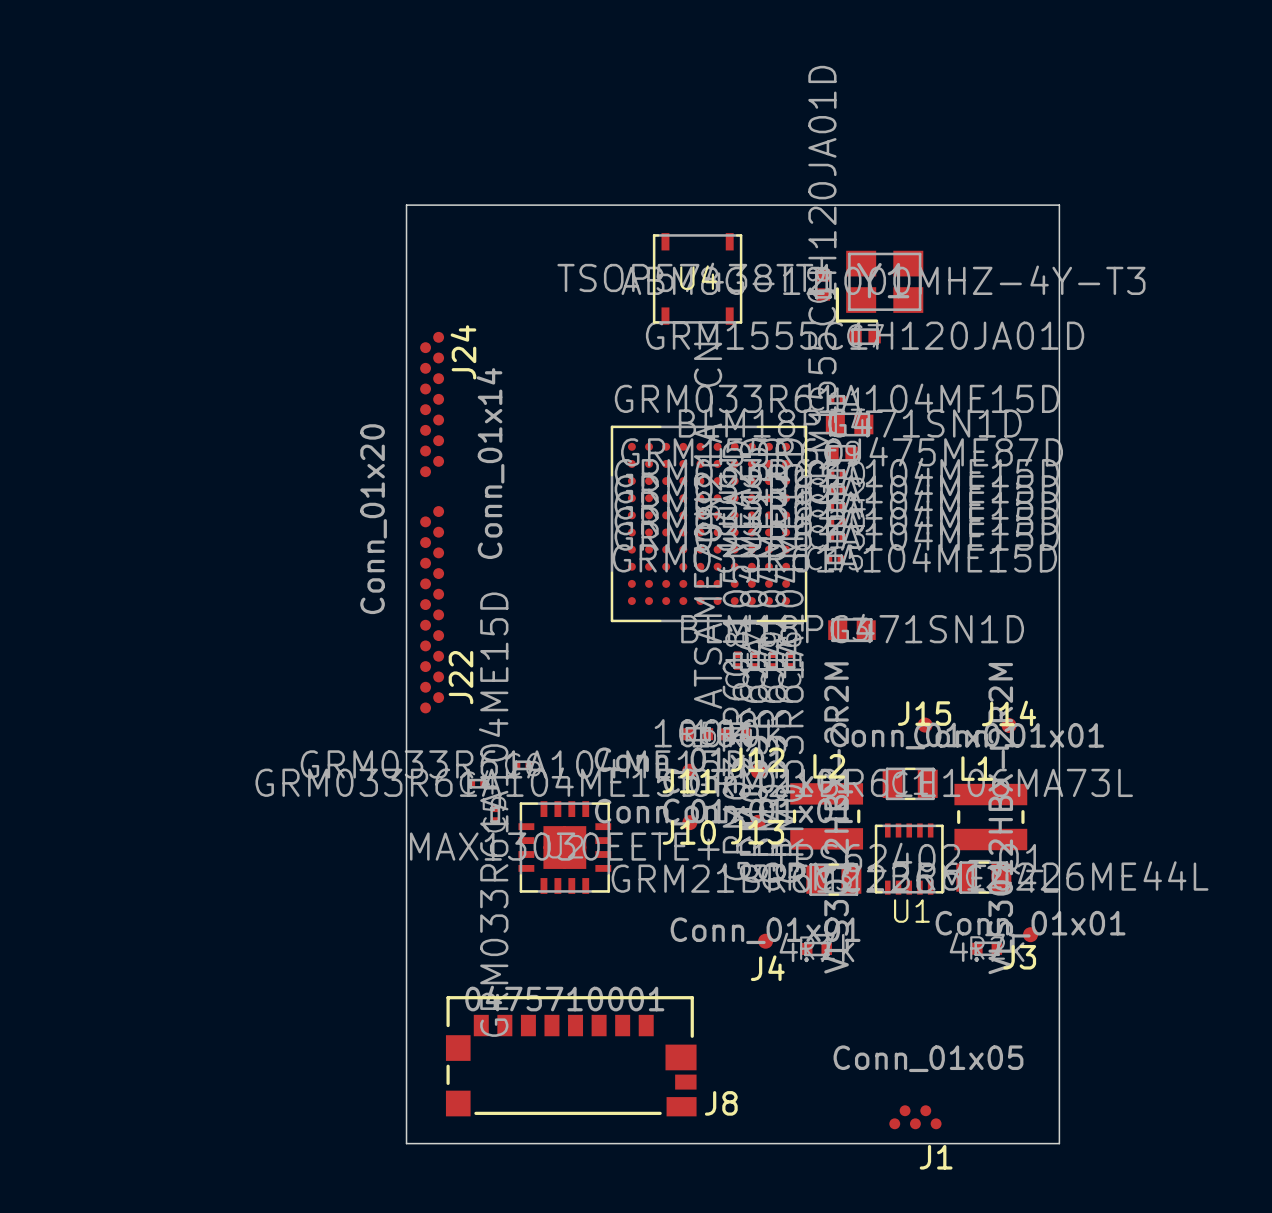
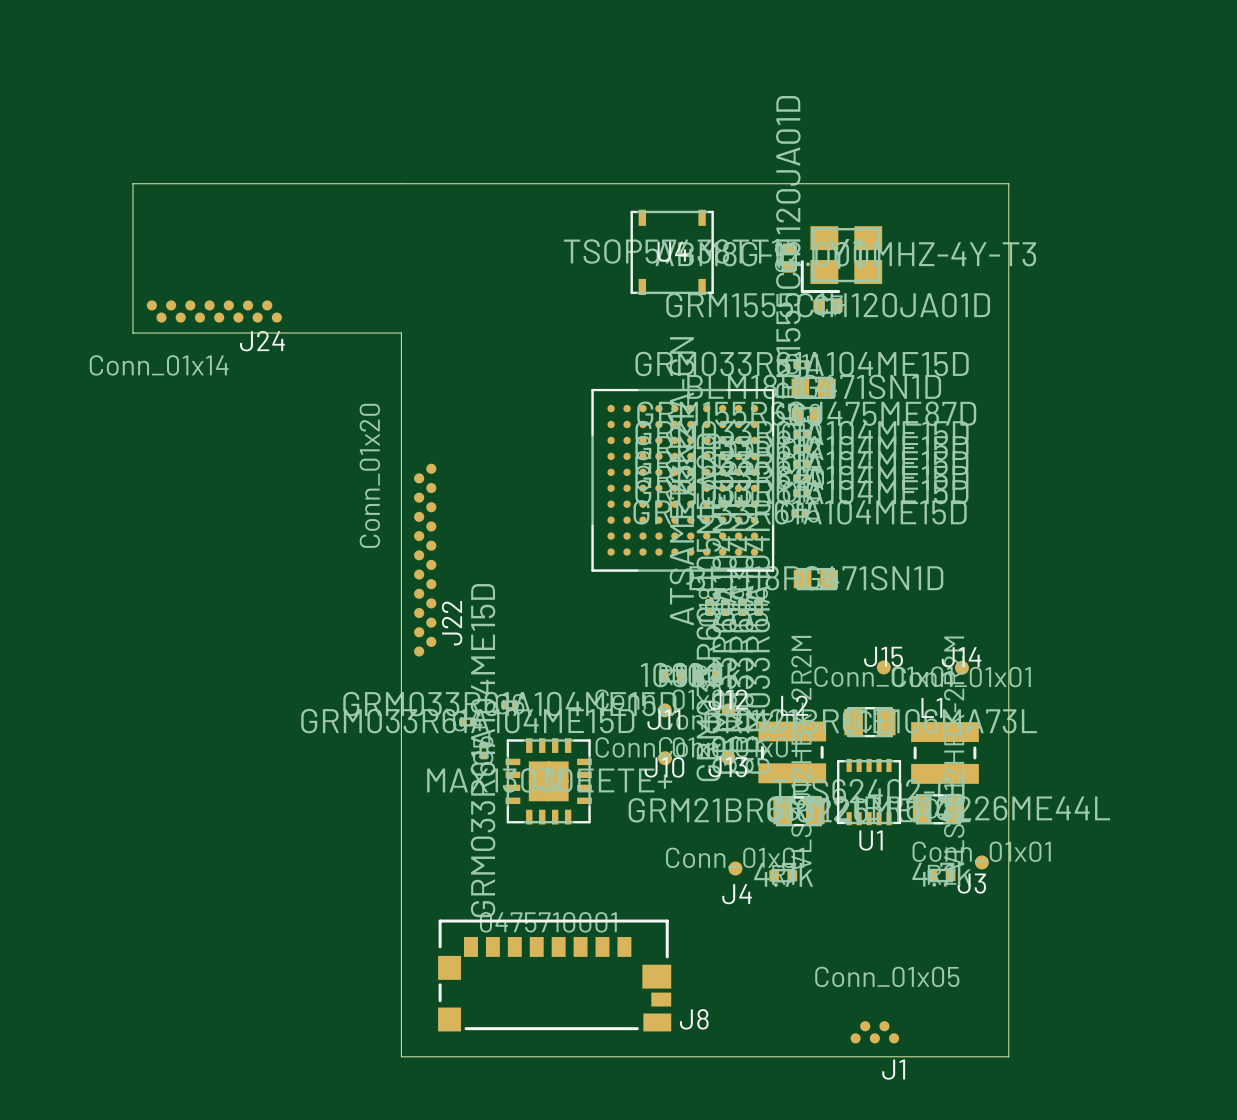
board edge: (406, 205) (406, 365) -> (401, 183) (132, 183) (132, 333) (401, 333)
J24 rotation: 0° (432, 404) -> 90° clockwise (214, 311)
J24 position: (432, 404) -> (214, 311)

